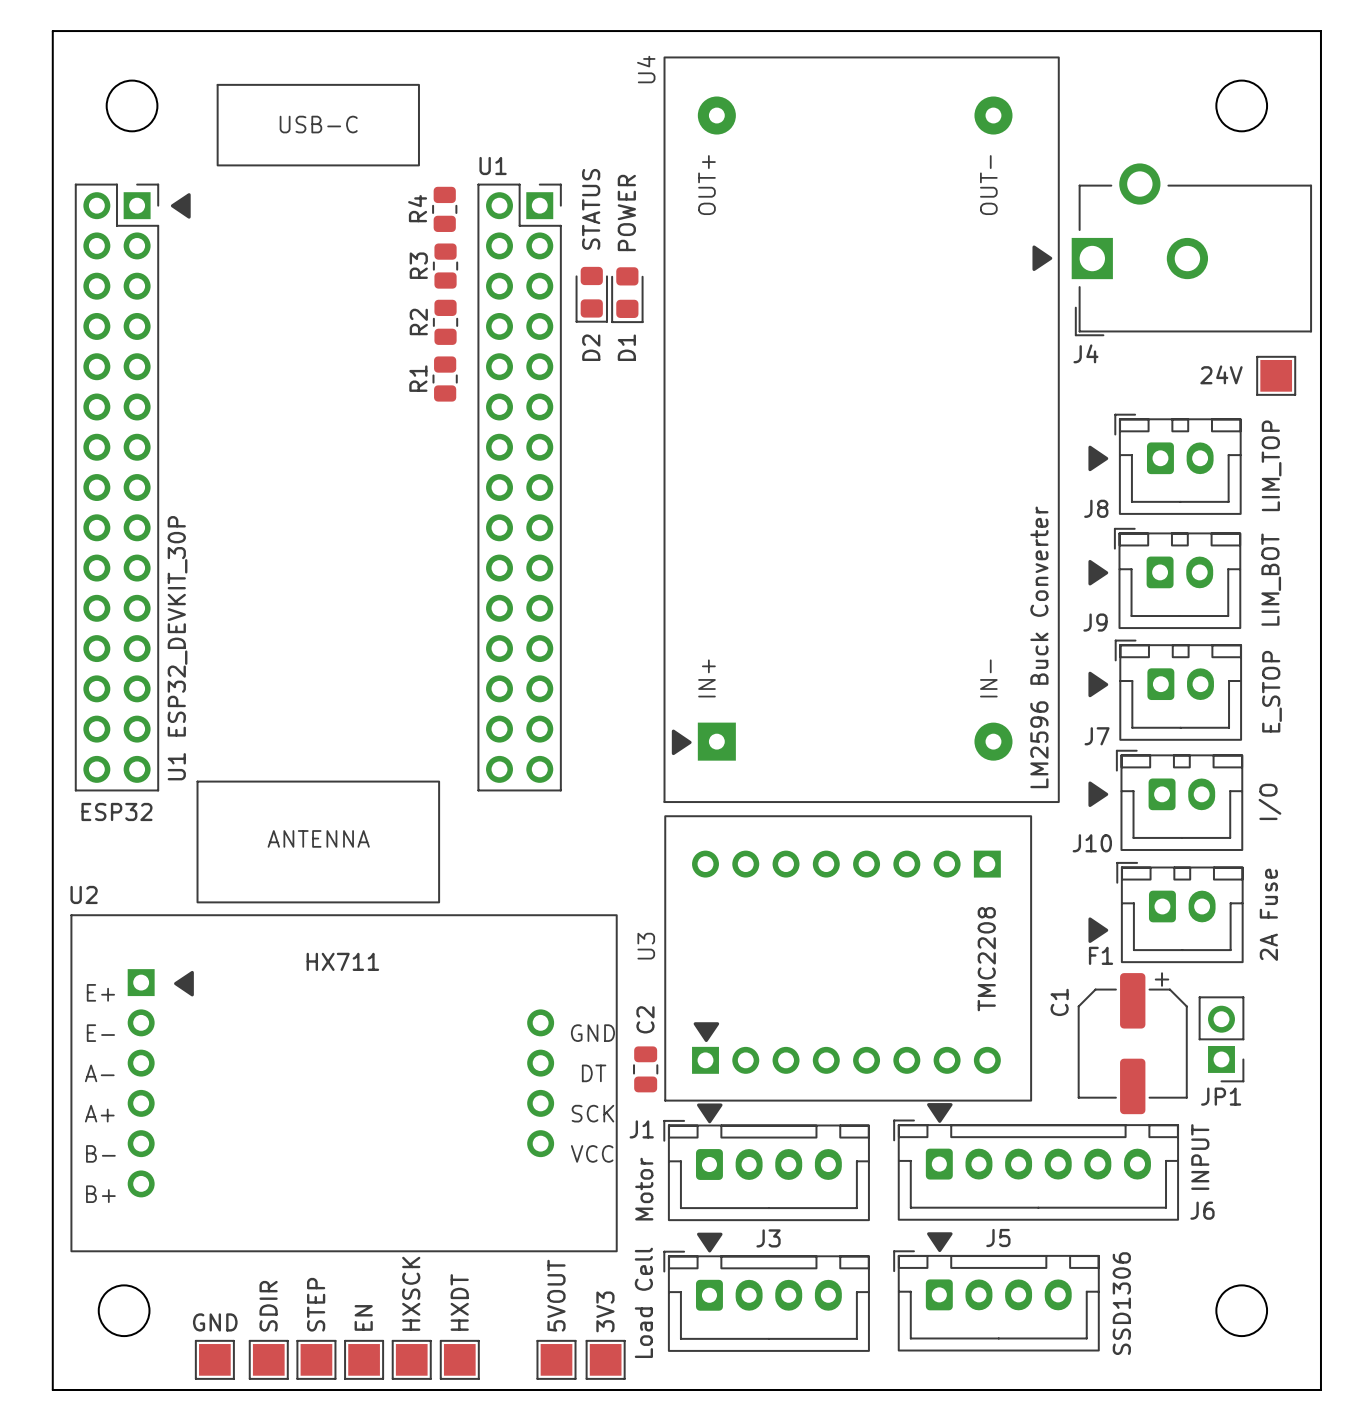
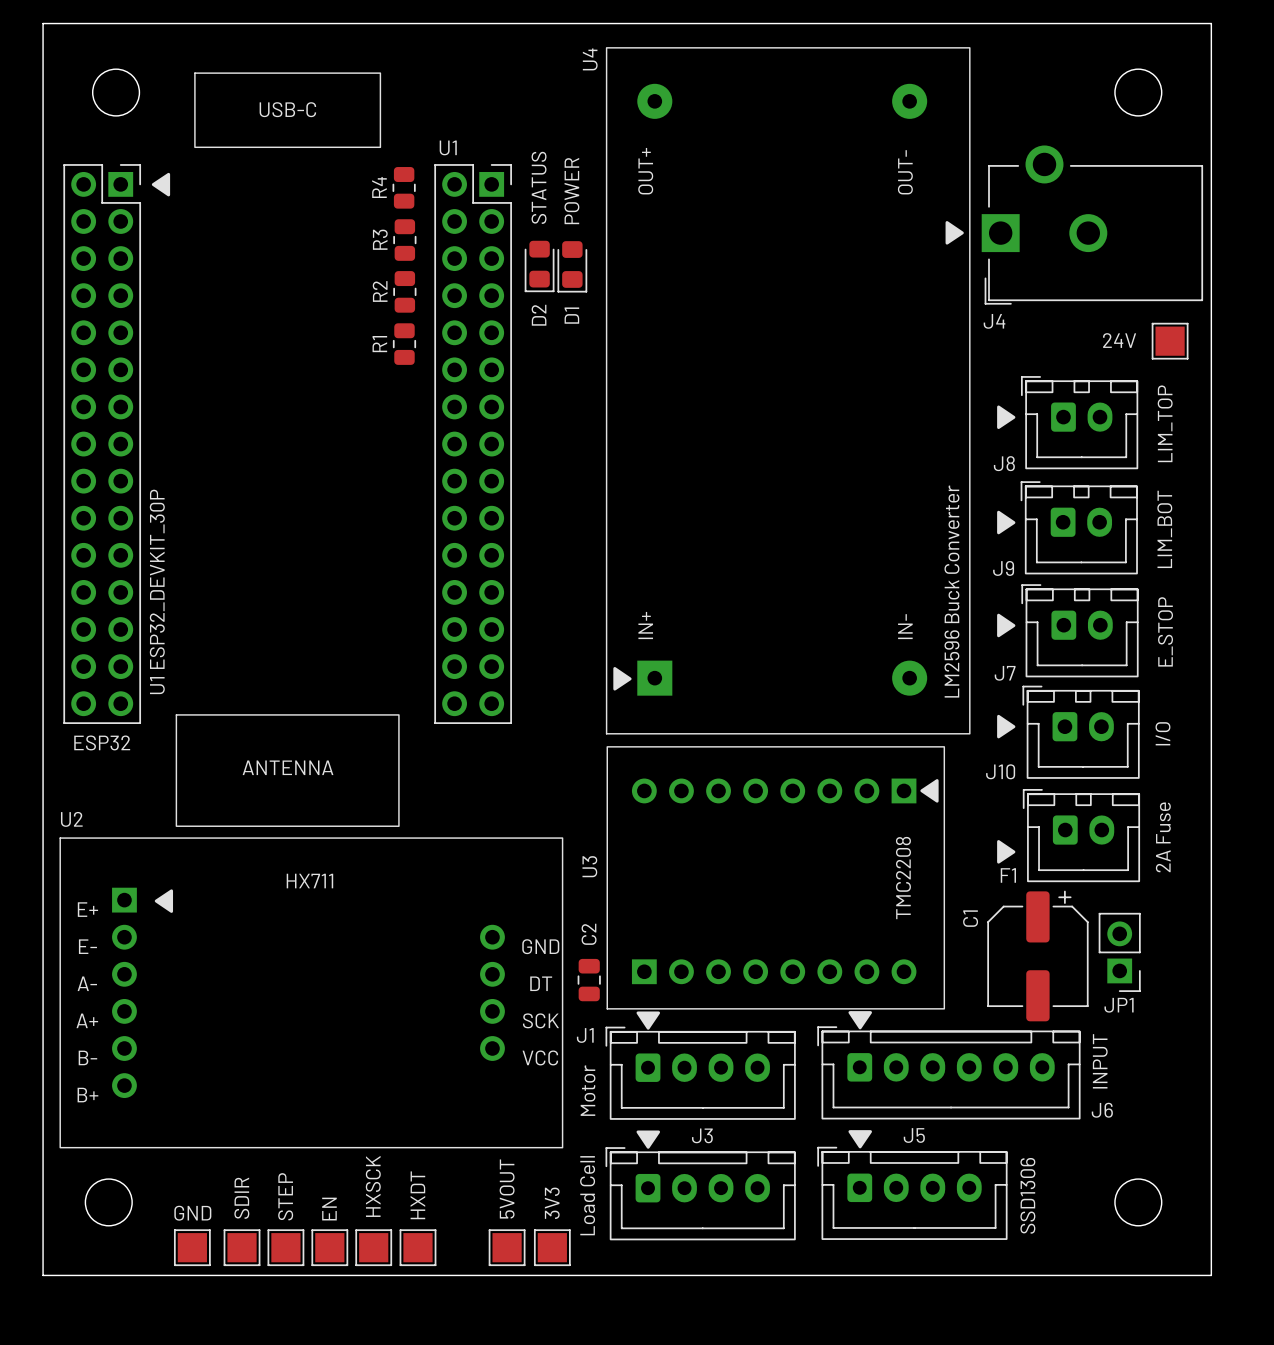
drawing: none -> [920, 779, 939, 803]
drawing: [693, 1022, 720, 1043] -> none

